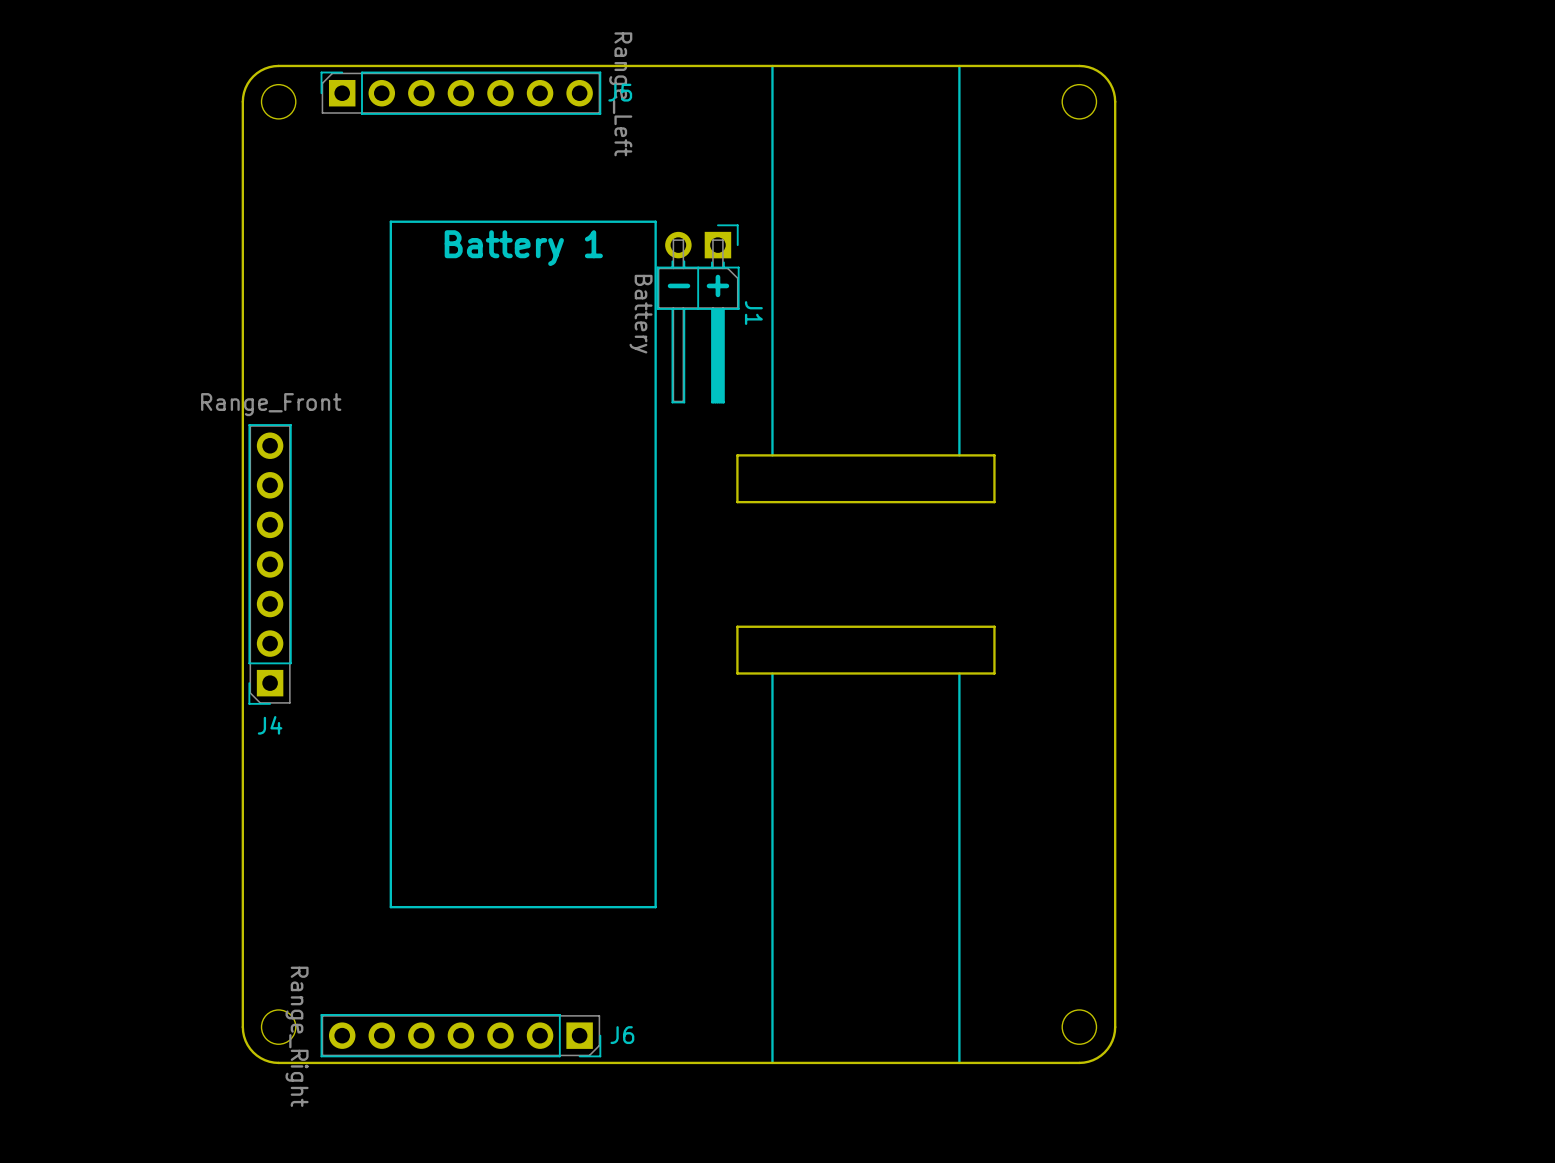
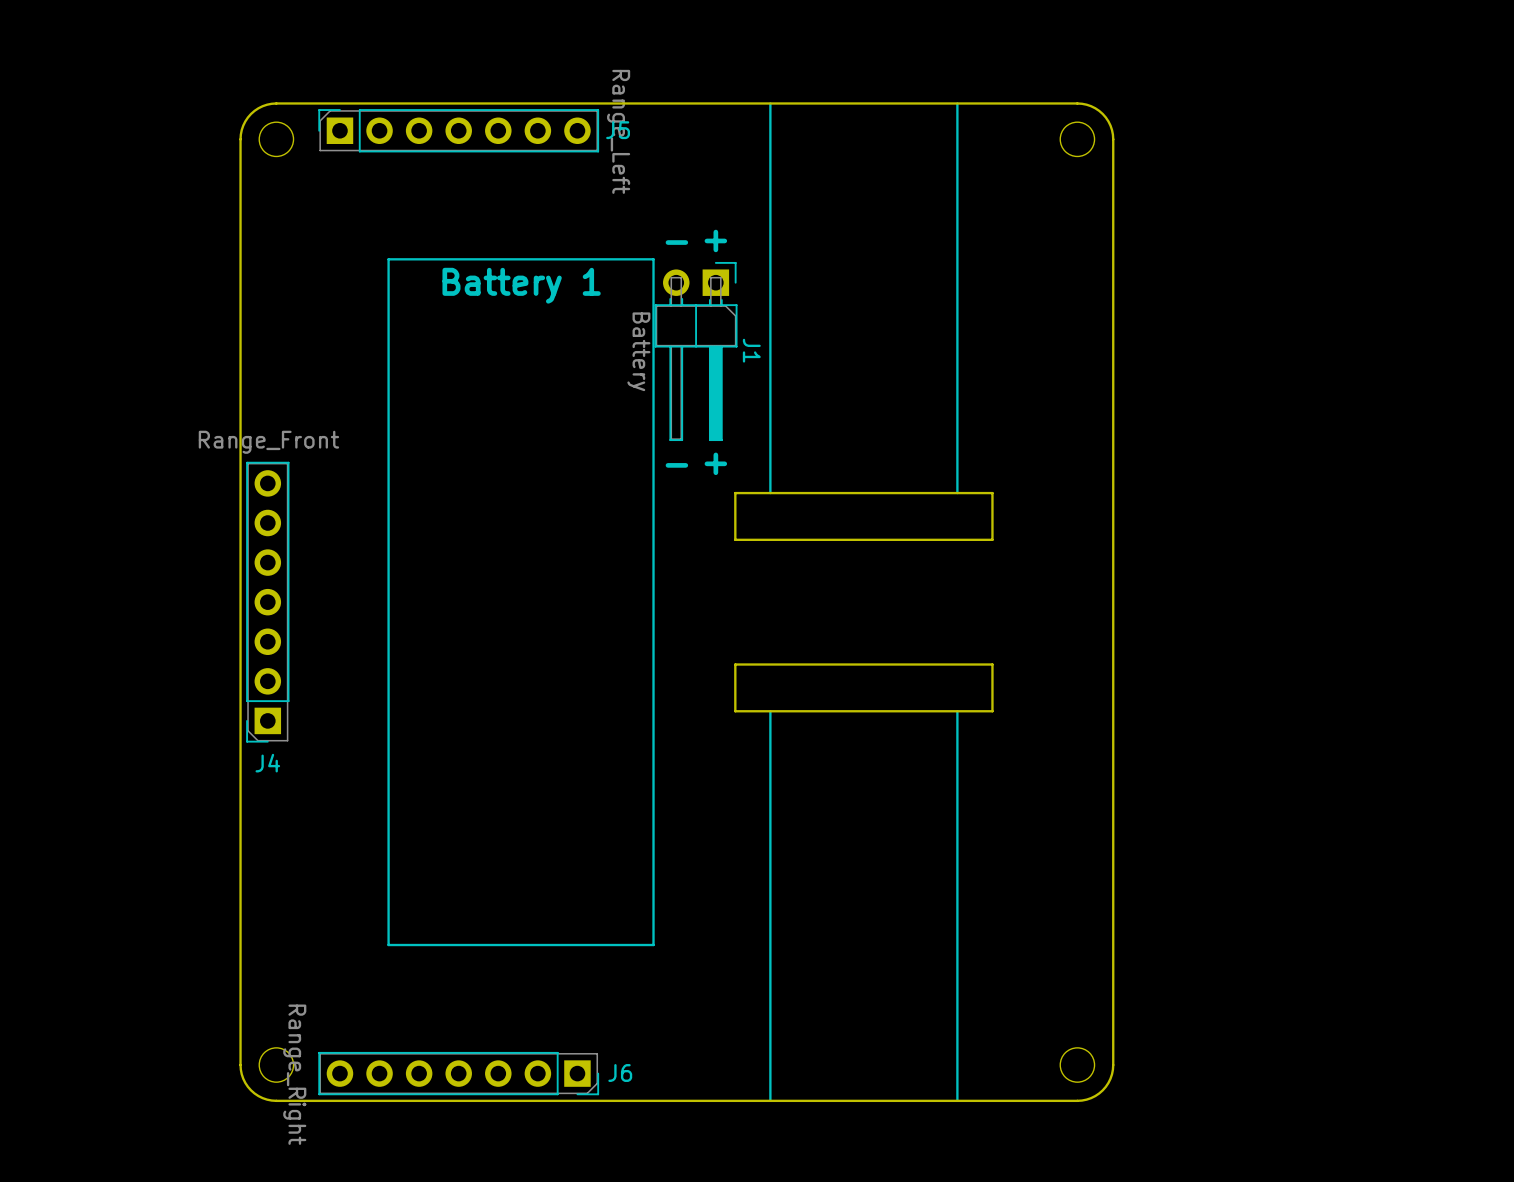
text: none -> + (715, 240)
text: none -> - (676, 242)
text: - (679, 285) -> none
text: + (717, 285) -> none
text: none -> + (715, 463)
text: none -> - (676, 465)

